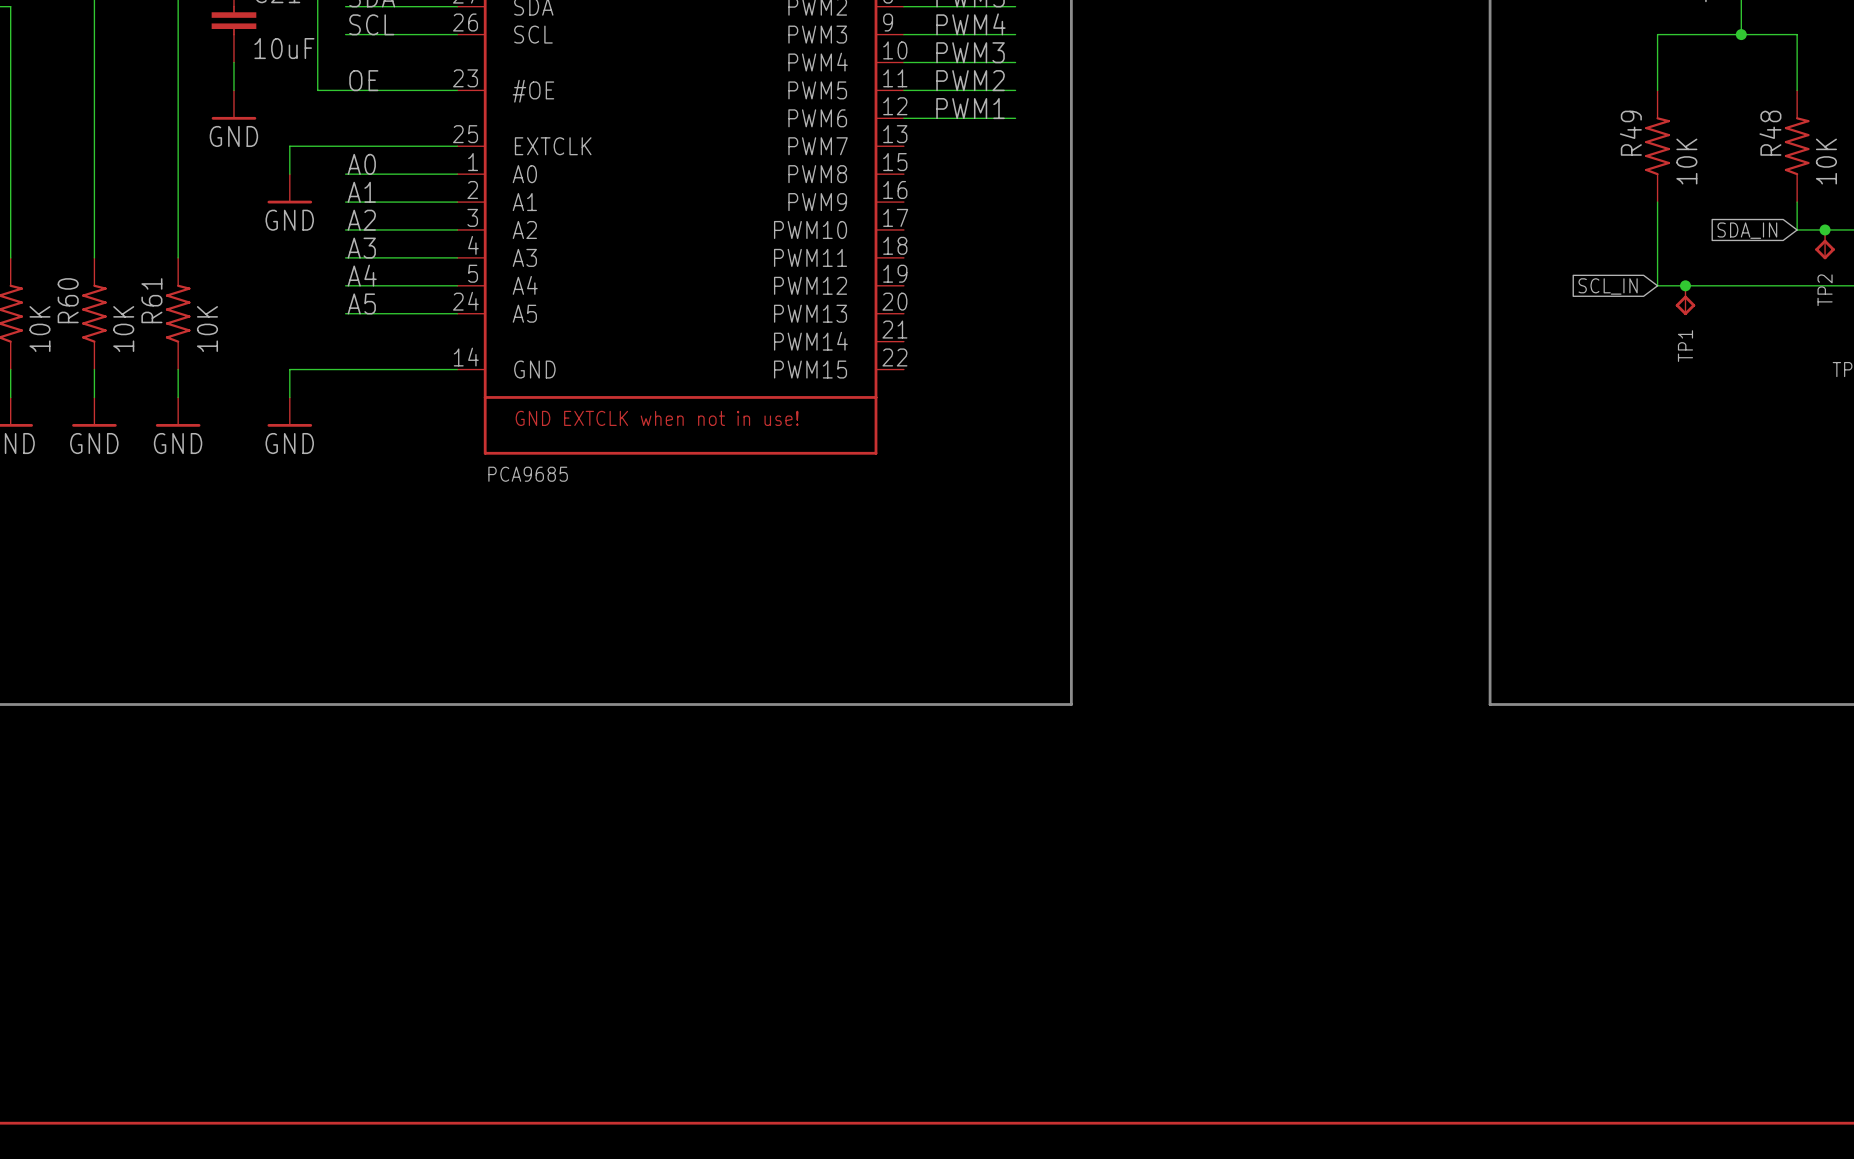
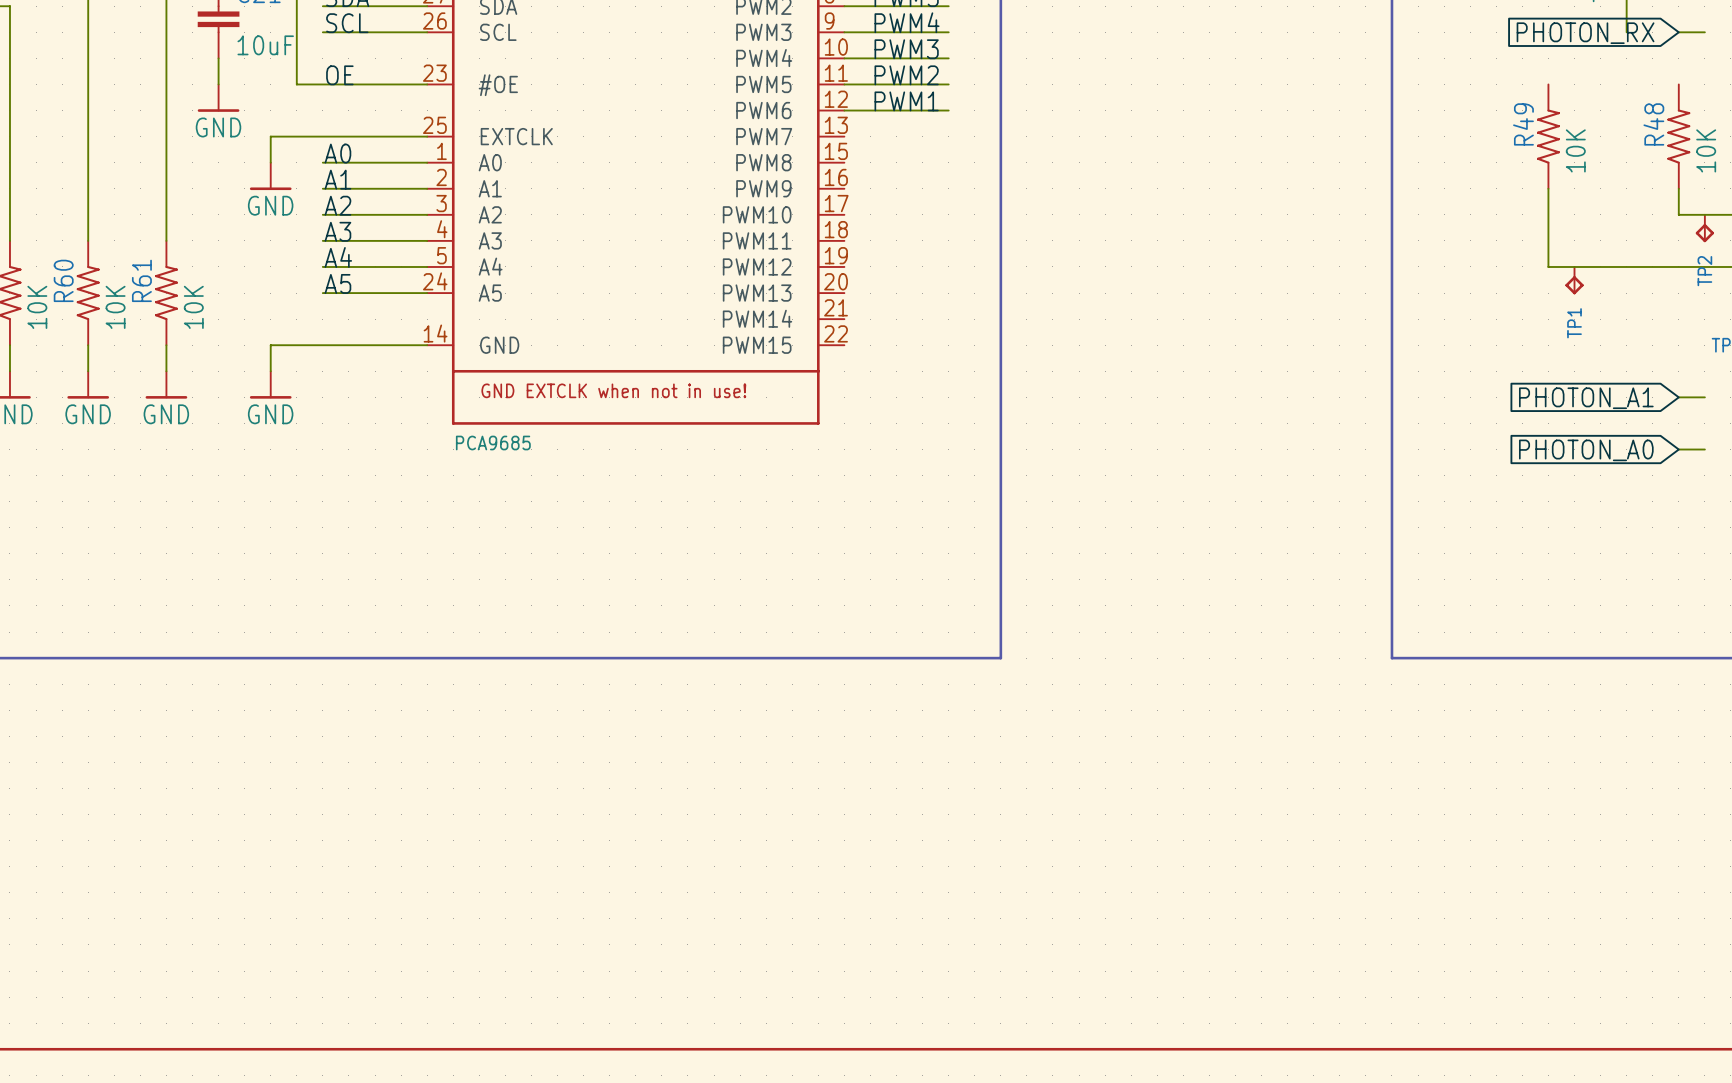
junction: (1741, 34) -> none
wire: none -> (1678, 32) (1704, 32)
global label: none -> PHOTON_RX (1585, 33)
wire: (1657, 90) (1657, 34) (1797, 34) (1797, 90) -> none
junction: (1825, 229) -> none
global label: SDA_IN (1747, 230) -> none
junction: (1685, 285) -> none
global label: SCL_IN (1608, 286) -> none
wire: none -> (1678, 397) (1704, 397)
global label: none -> PHOTON_A1 (1586, 398)
wire: none -> (1678, 449) (1704, 449)
global label: none -> PHOTON_A0 (1586, 450)

